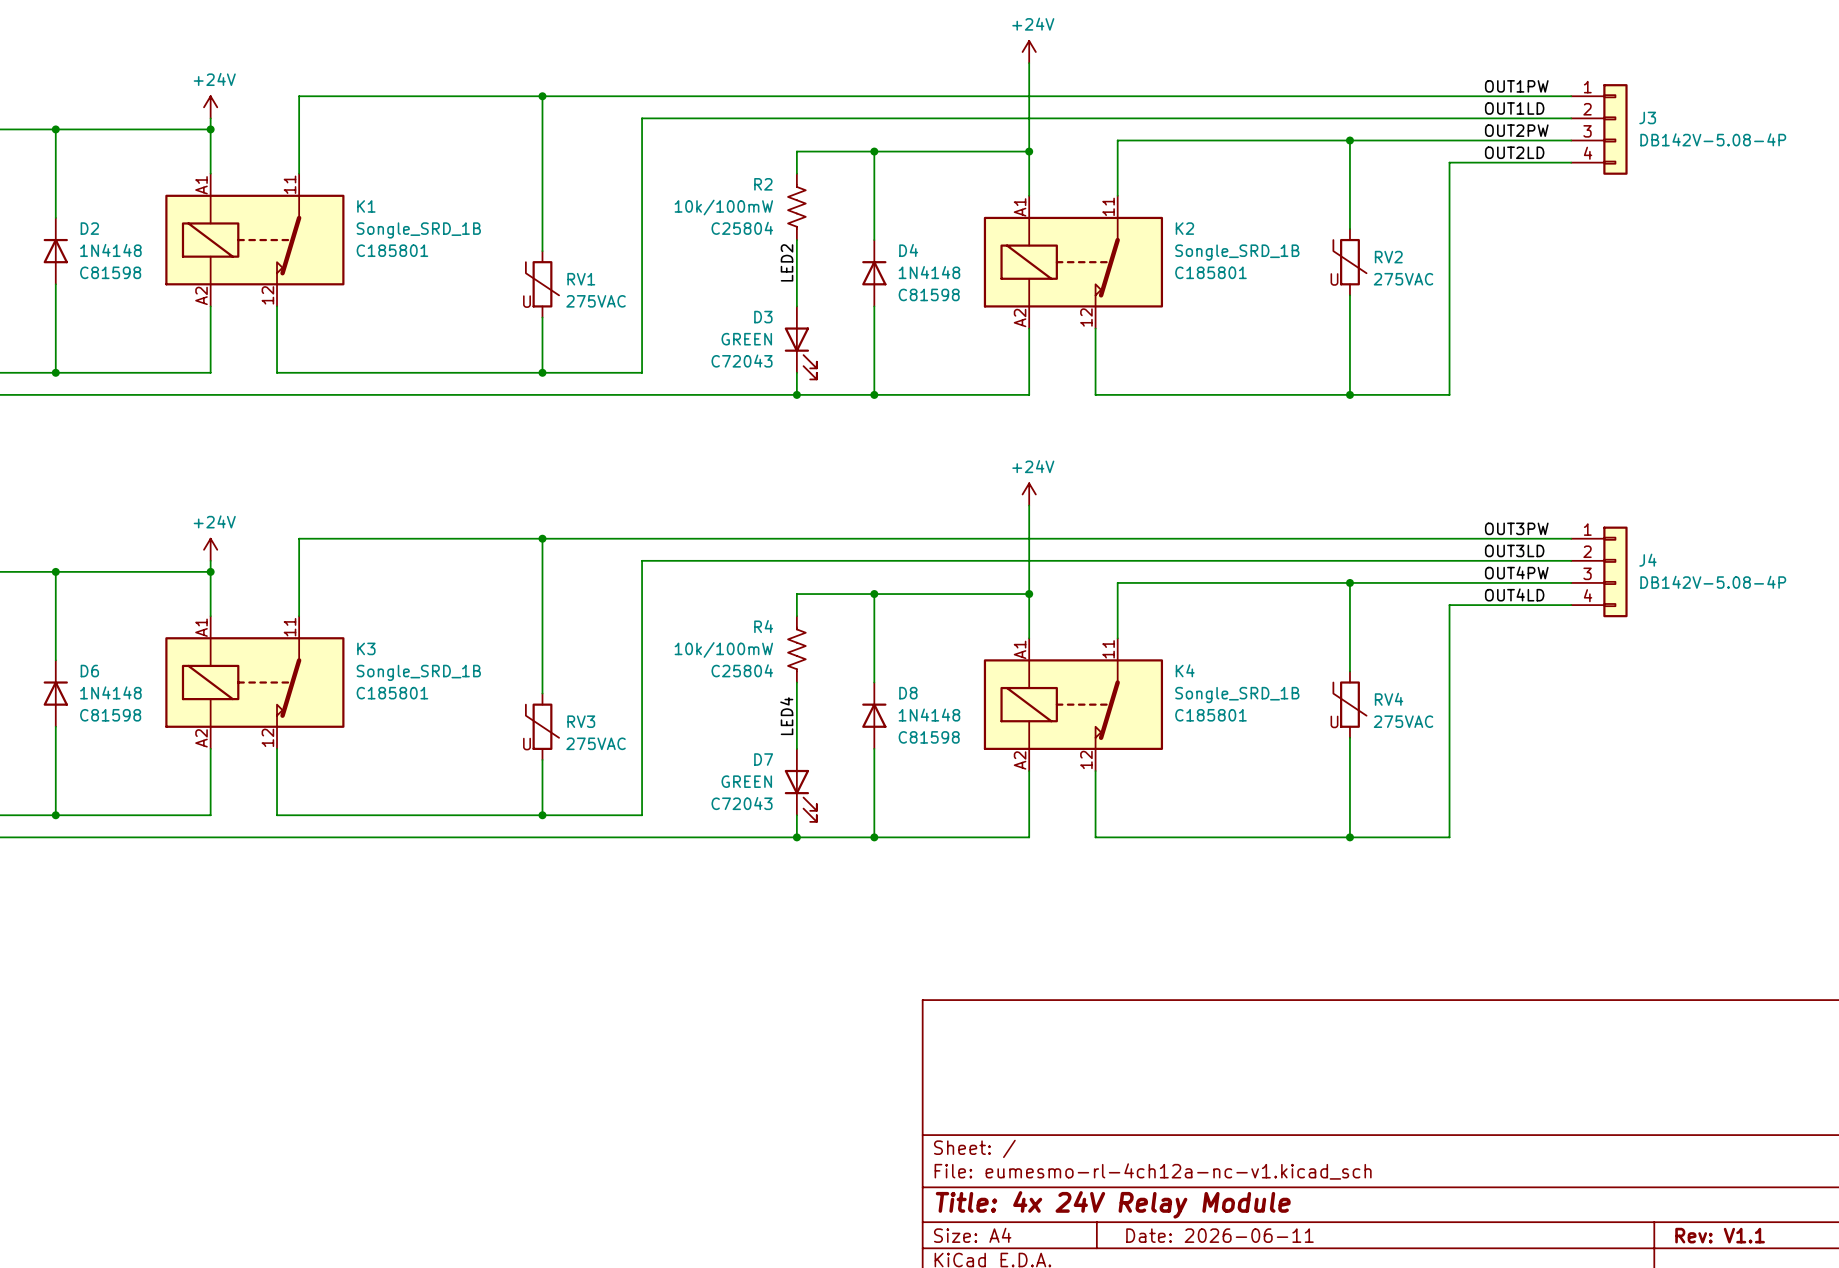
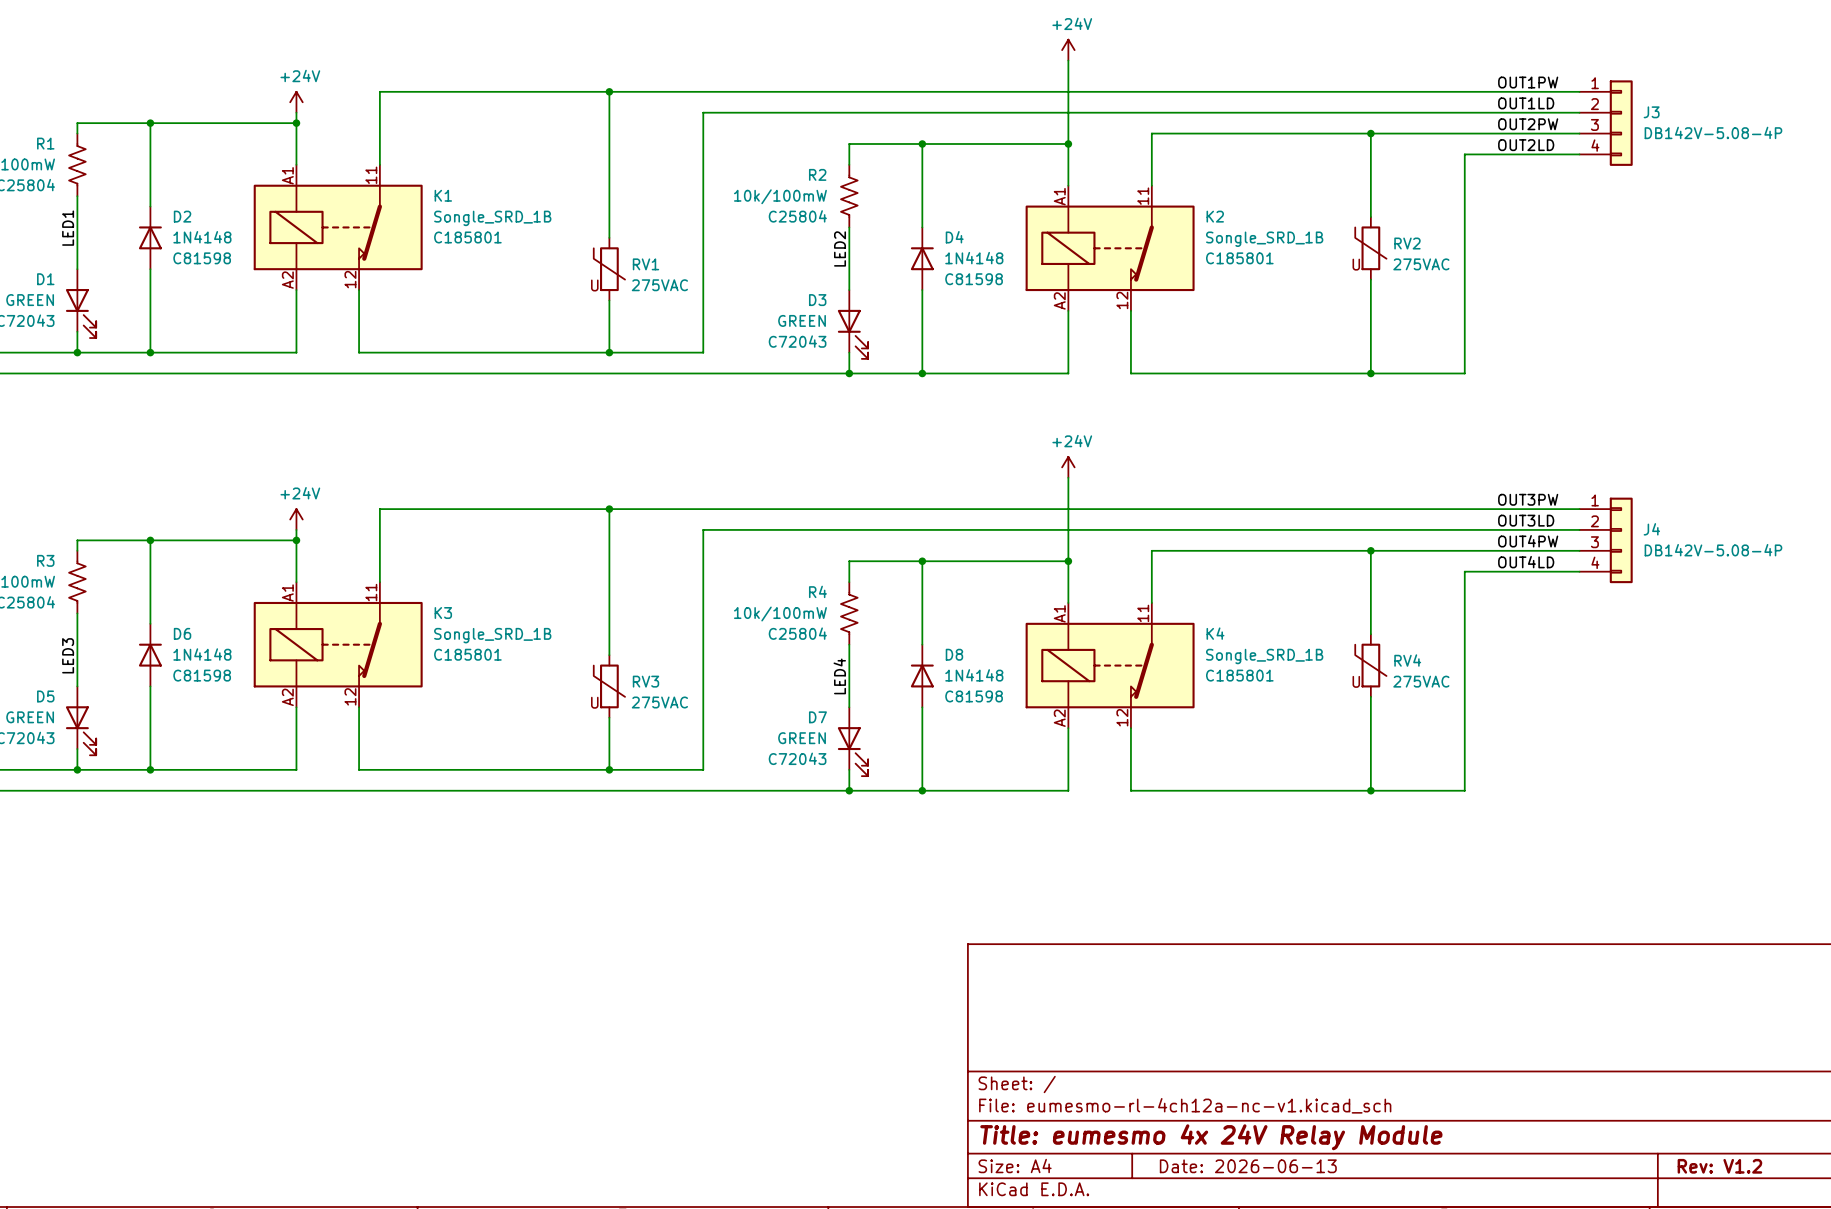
title block: Title: 4x 24V Relay Module (1113, 1204) -> Title: eumesmo 4x 24V Relay Module (1211, 1137)
title block: Date: 2026-06-11 (1219, 1235) -> Date: 2026-06-13 (1248, 1166)
title block: Rev: V1.1 (1720, 1235) -> Rev: V1.2 (1719, 1166)

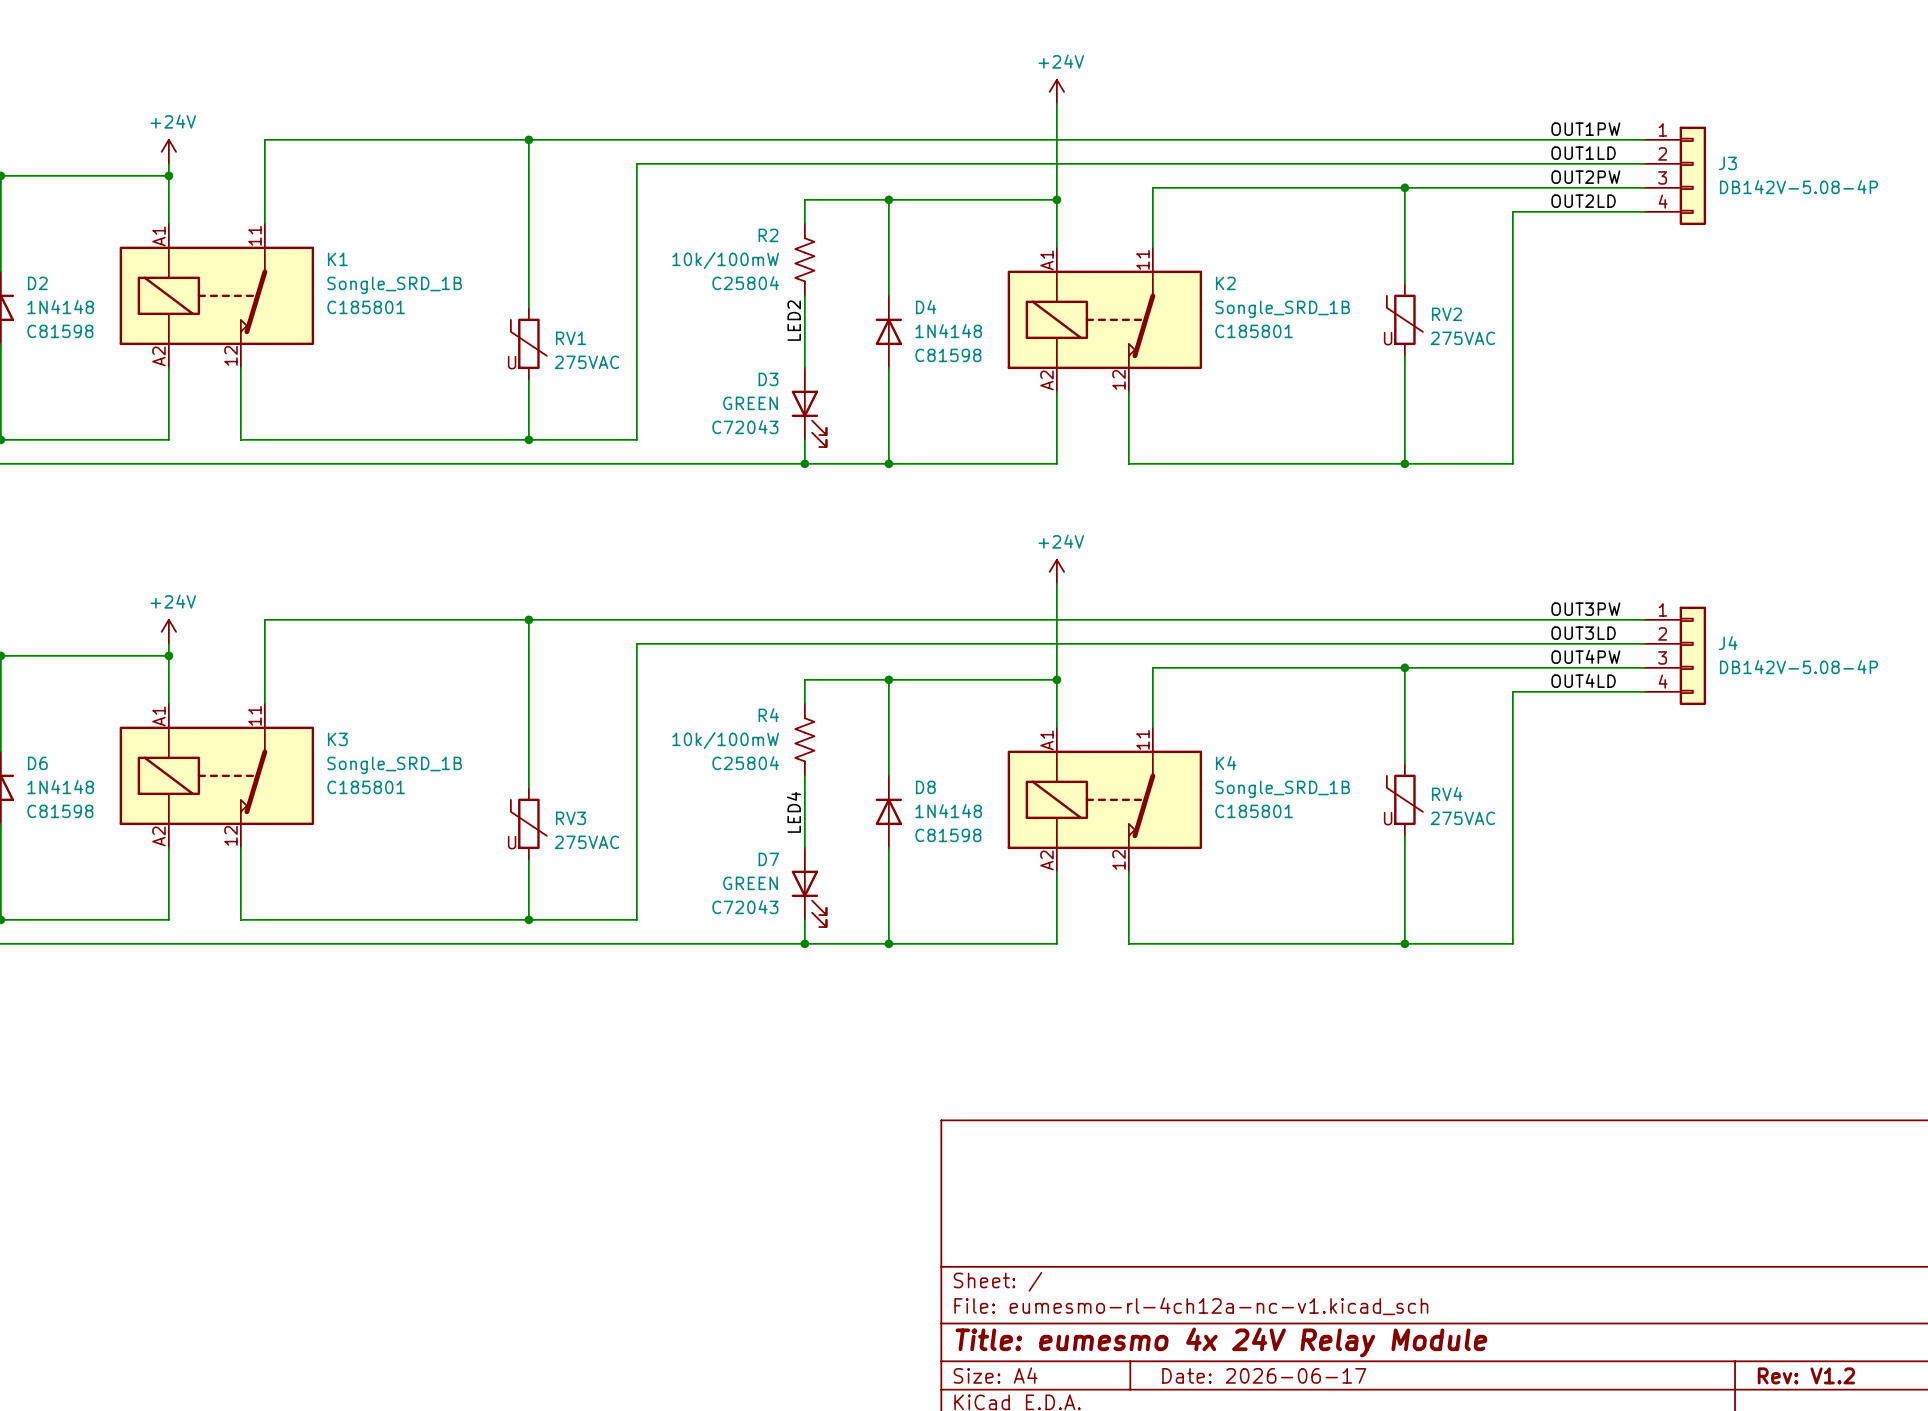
title block: Date: 2026-06-13 (1248, 1166) -> Date: 2026-06-17 (1264, 1375)

